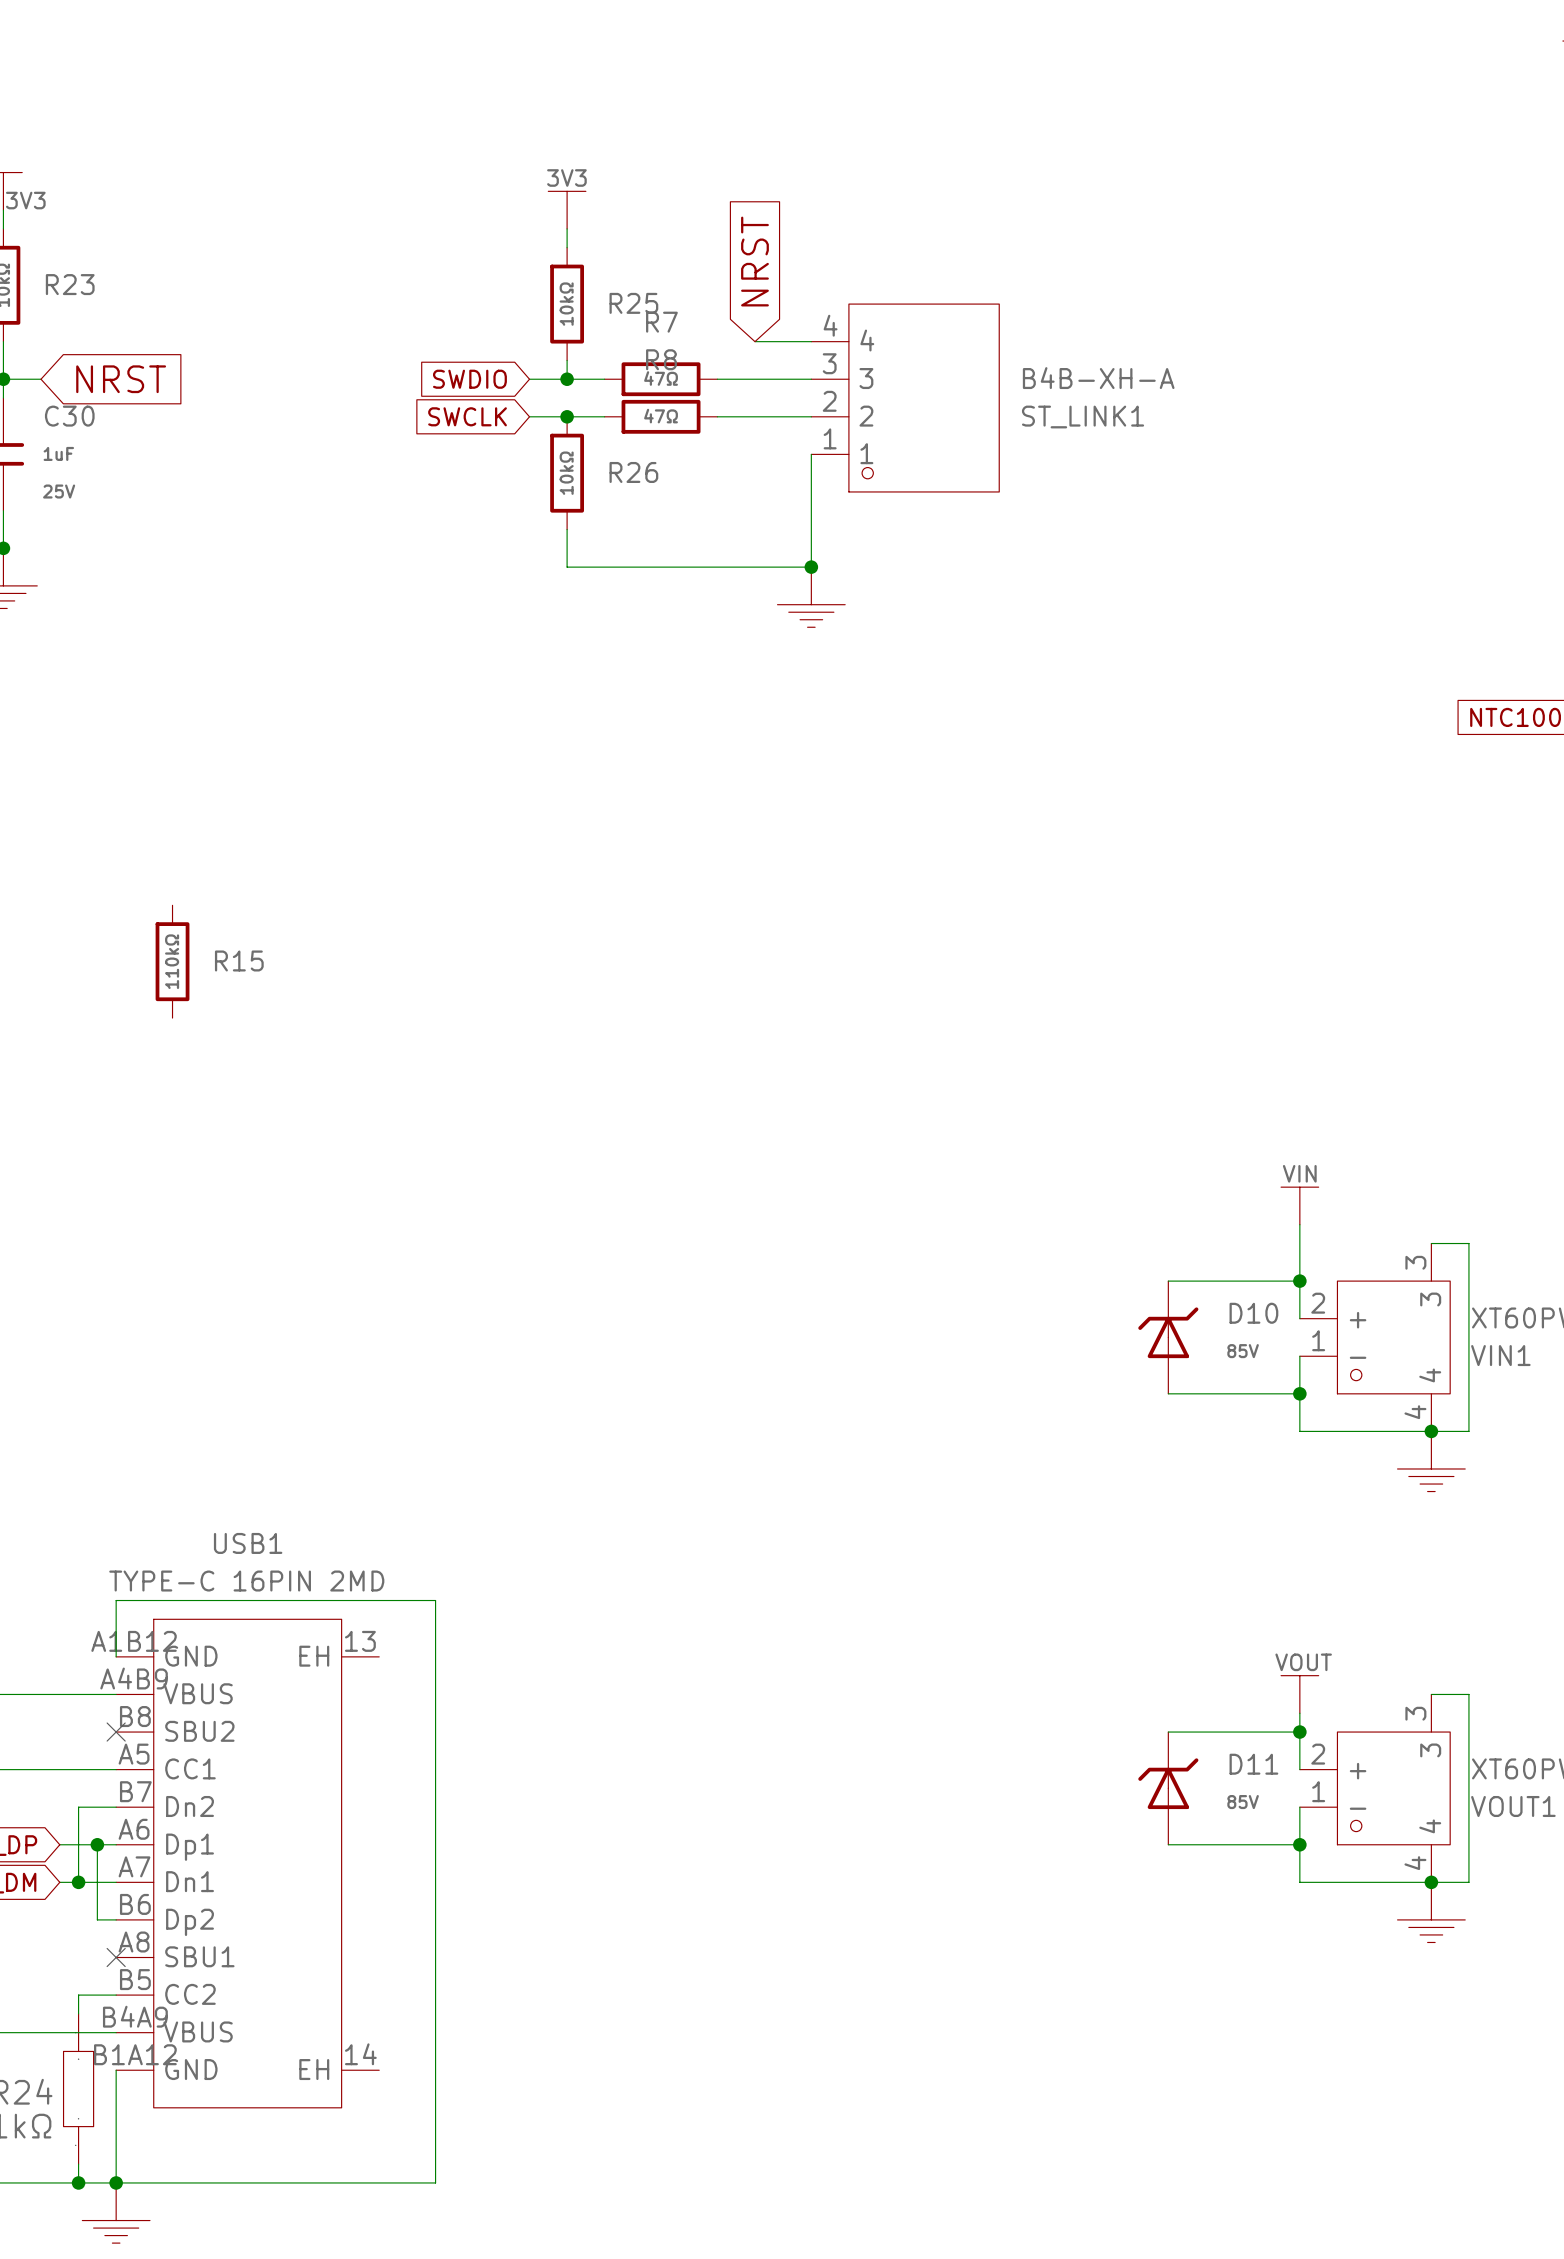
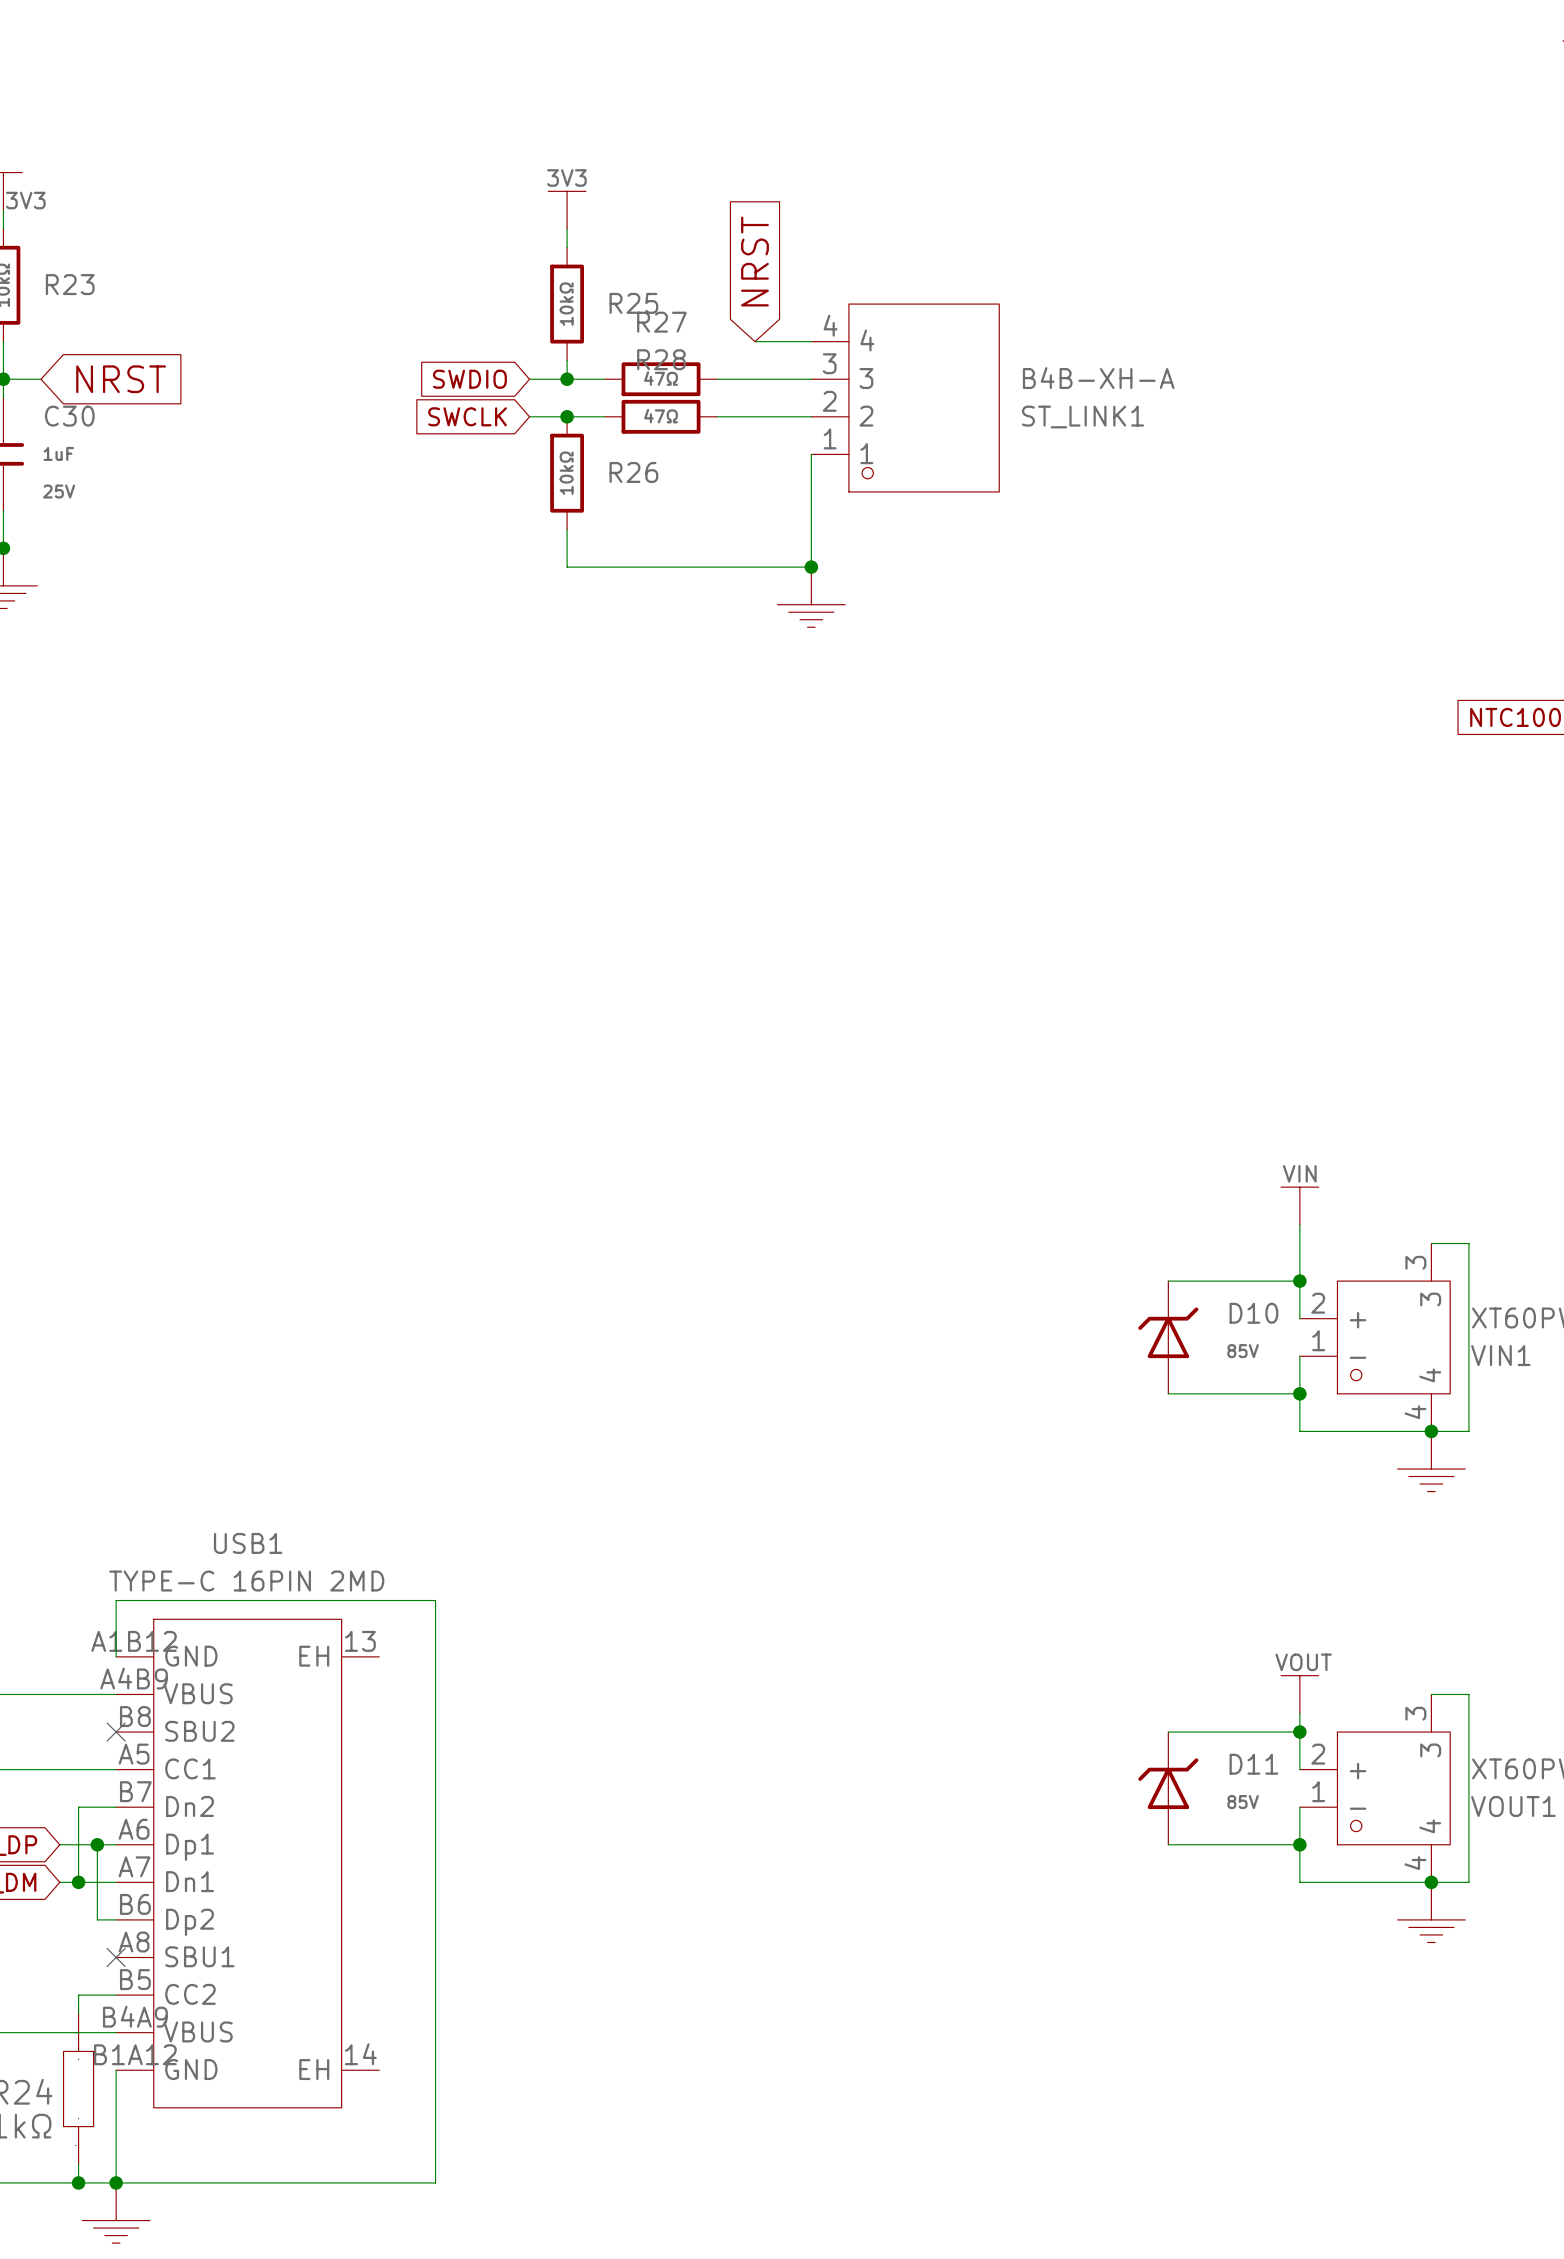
R7 name: R7 (661, 322) -> R27 (661, 322)
R8 name: R8 (661, 359) -> R28 (661, 359)
R15: 110kΩ (172, 961) -> none

